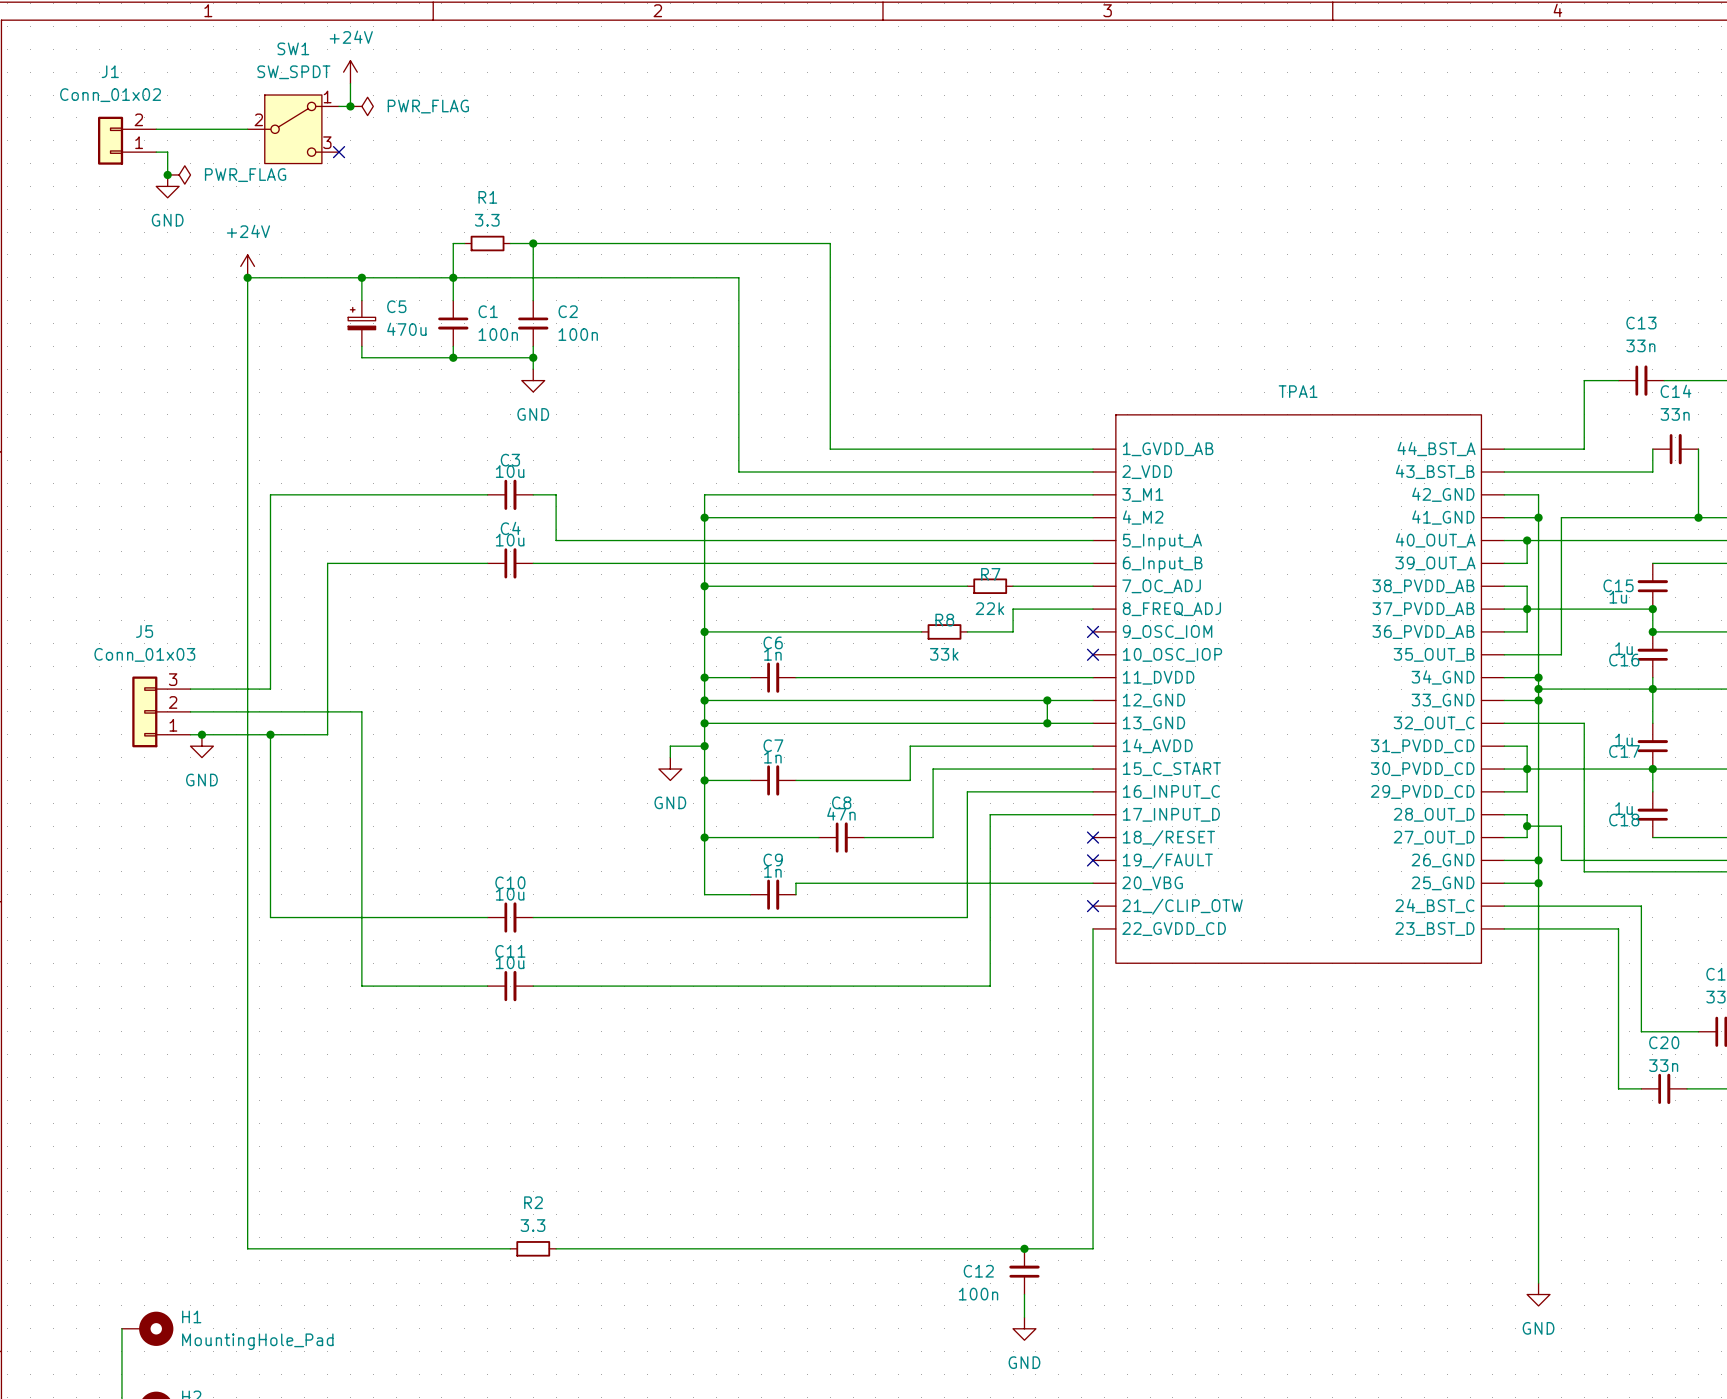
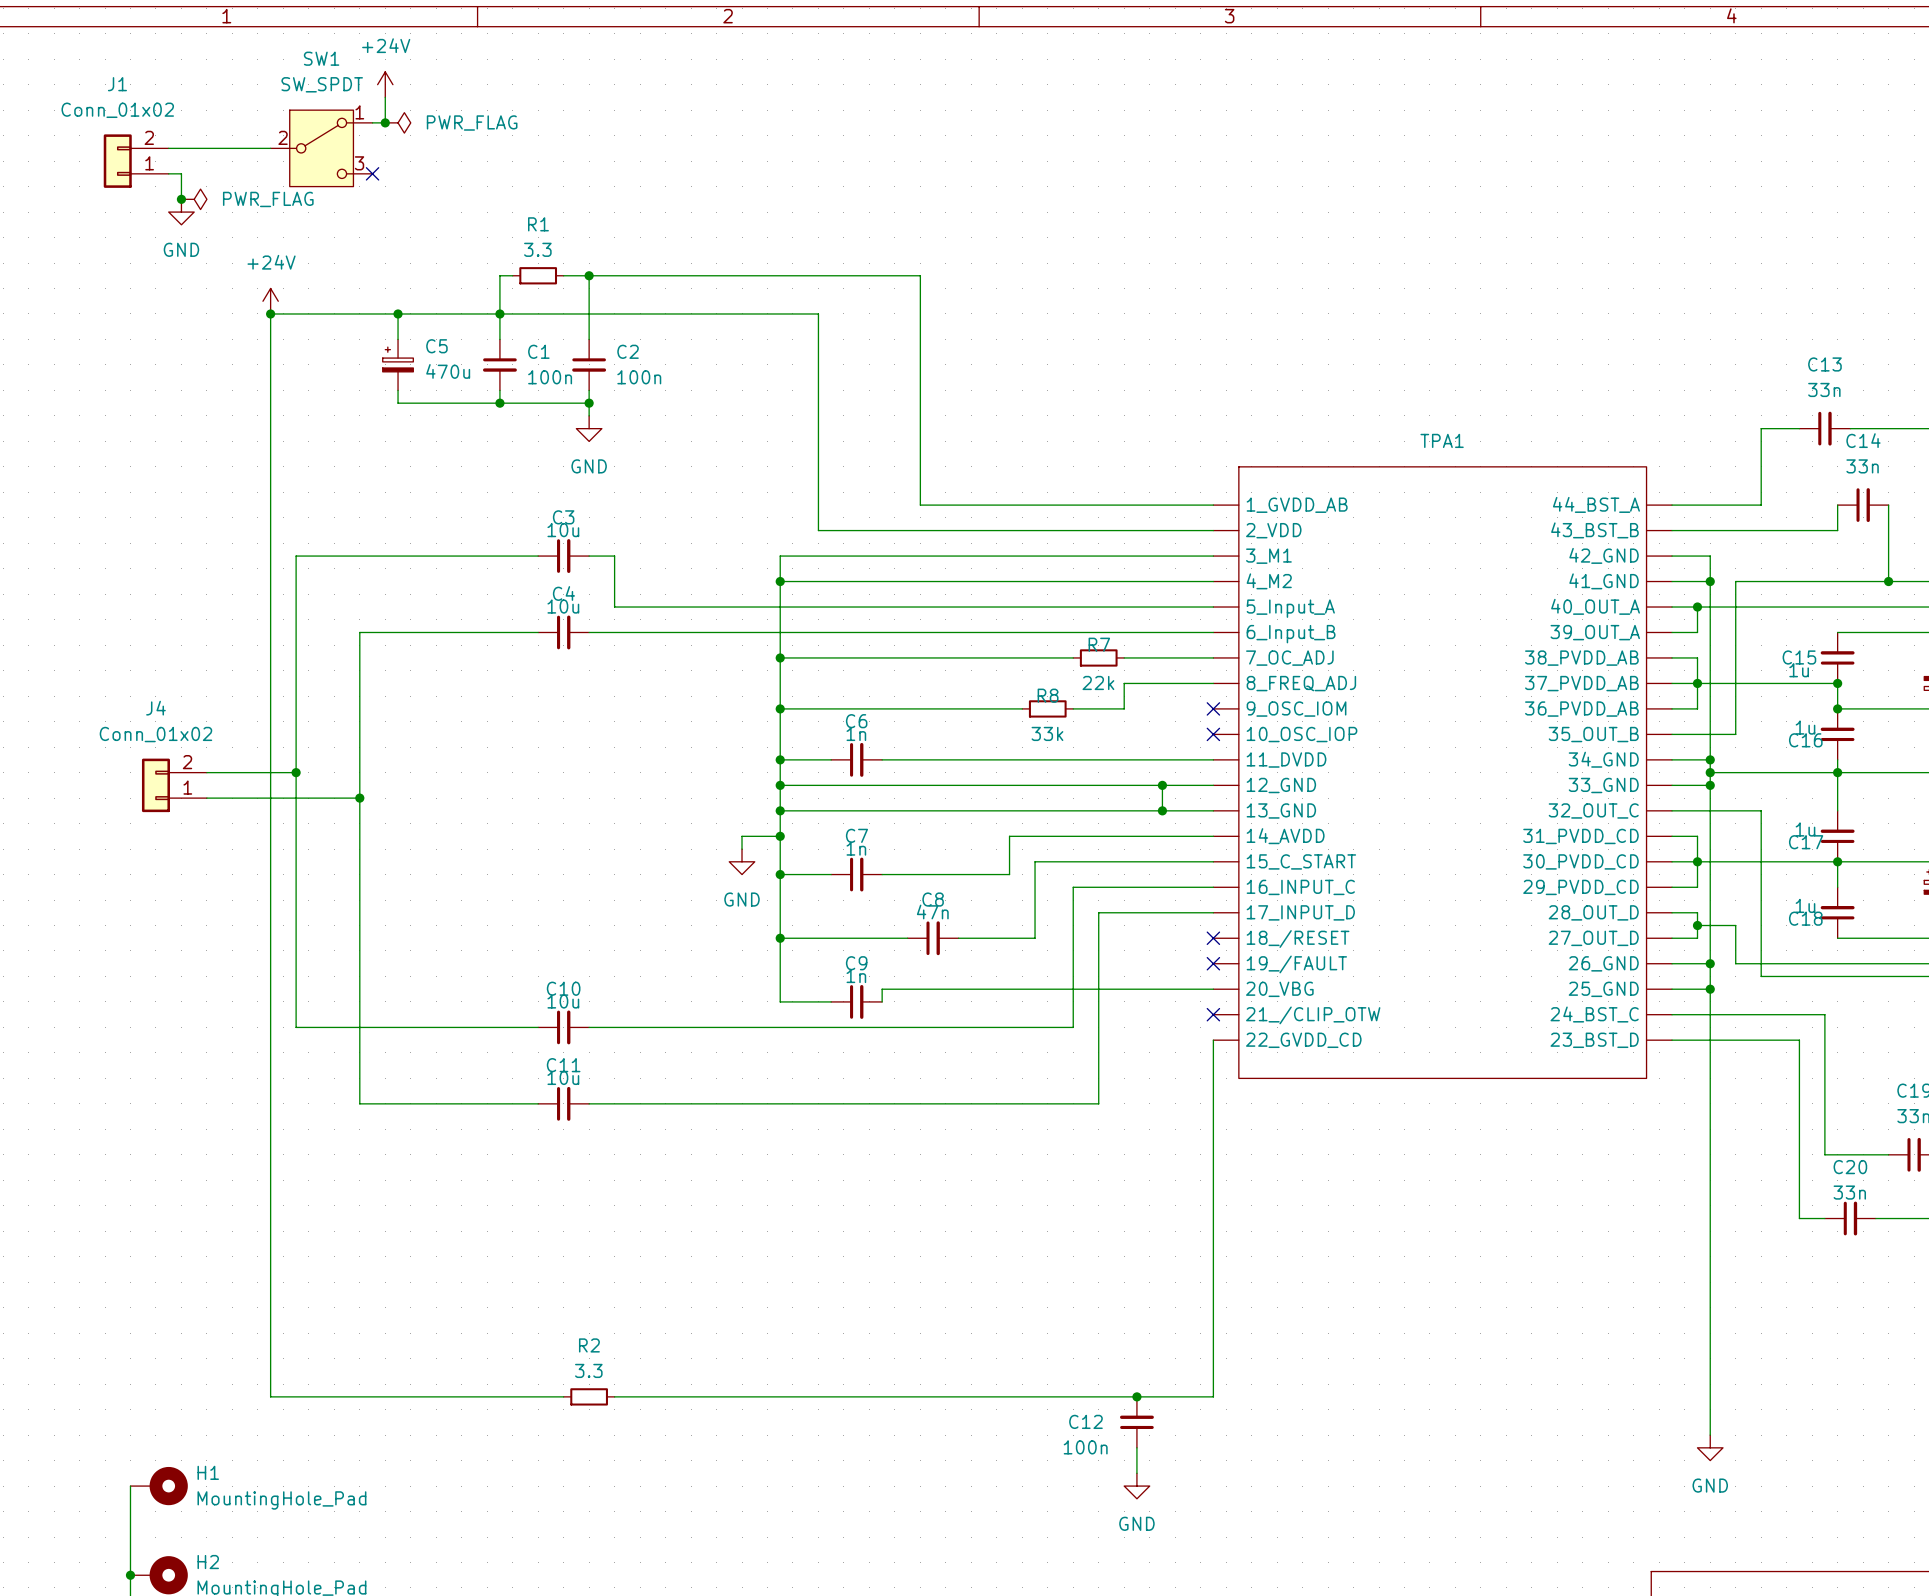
wire: none -> (296, 772) (296, 823)
junction: none -> (296, 772)
J4: none -> Conn_01x02 (174, 785)
J5: Conn_01x03 (161, 711) -> none
wire: (327, 711) (361, 711) (361, 986) -> (359, 823) (359, 1103) (398, 1103)
junction: none -> (359, 798)
wire: (190, 734) (327, 734) -> none
junction: (201, 734) -> none
junction: (270, 734) -> none
power symbol: GND (201, 746) -> none

